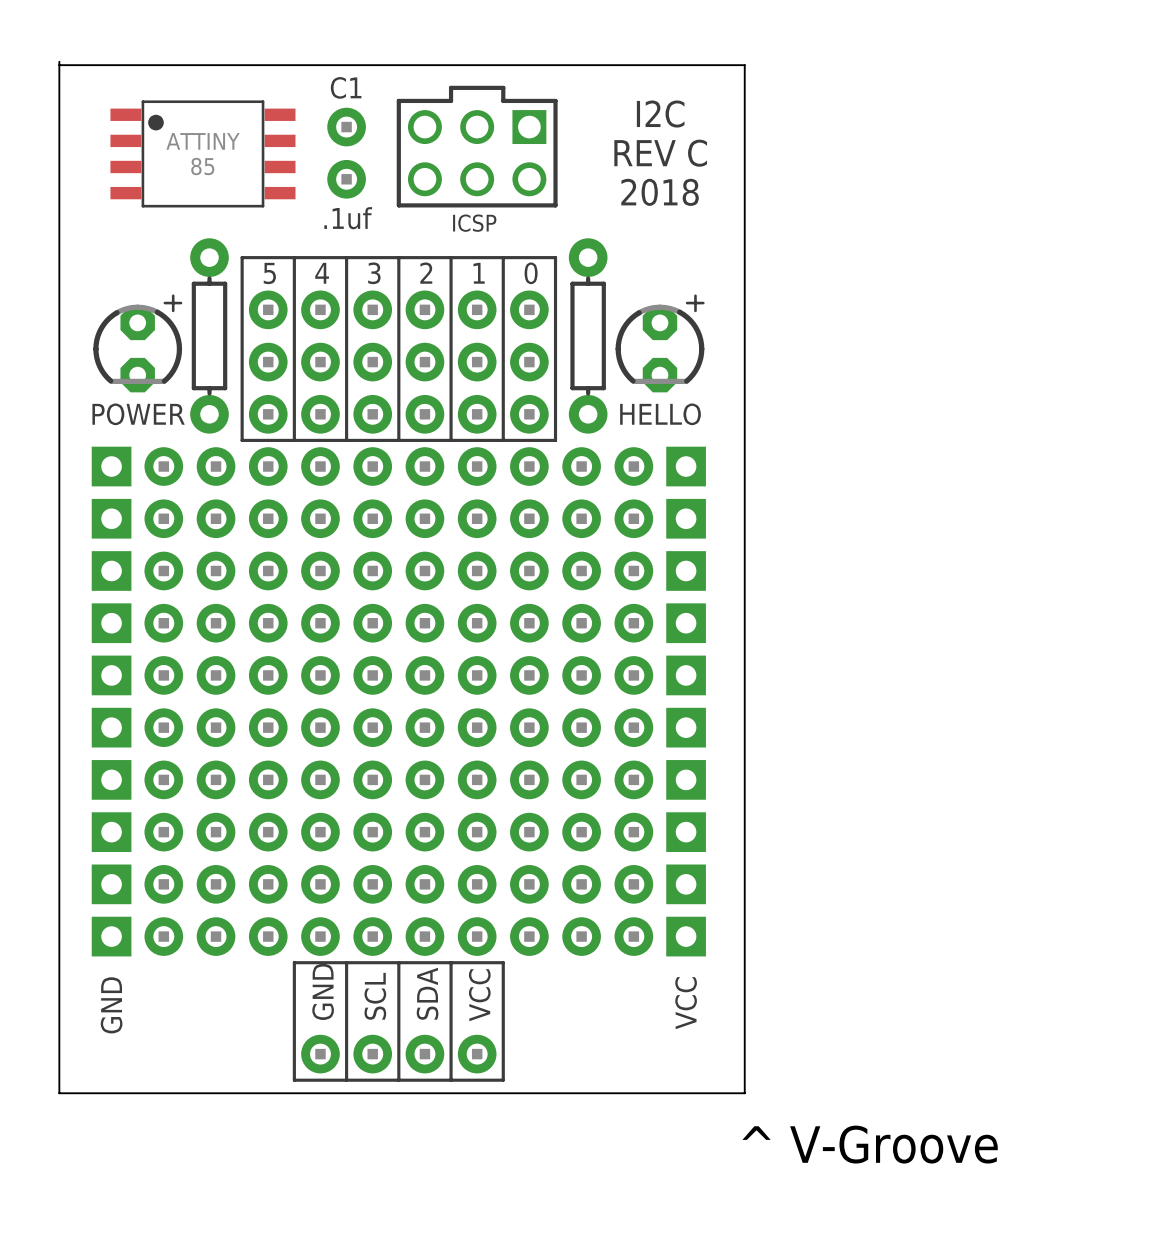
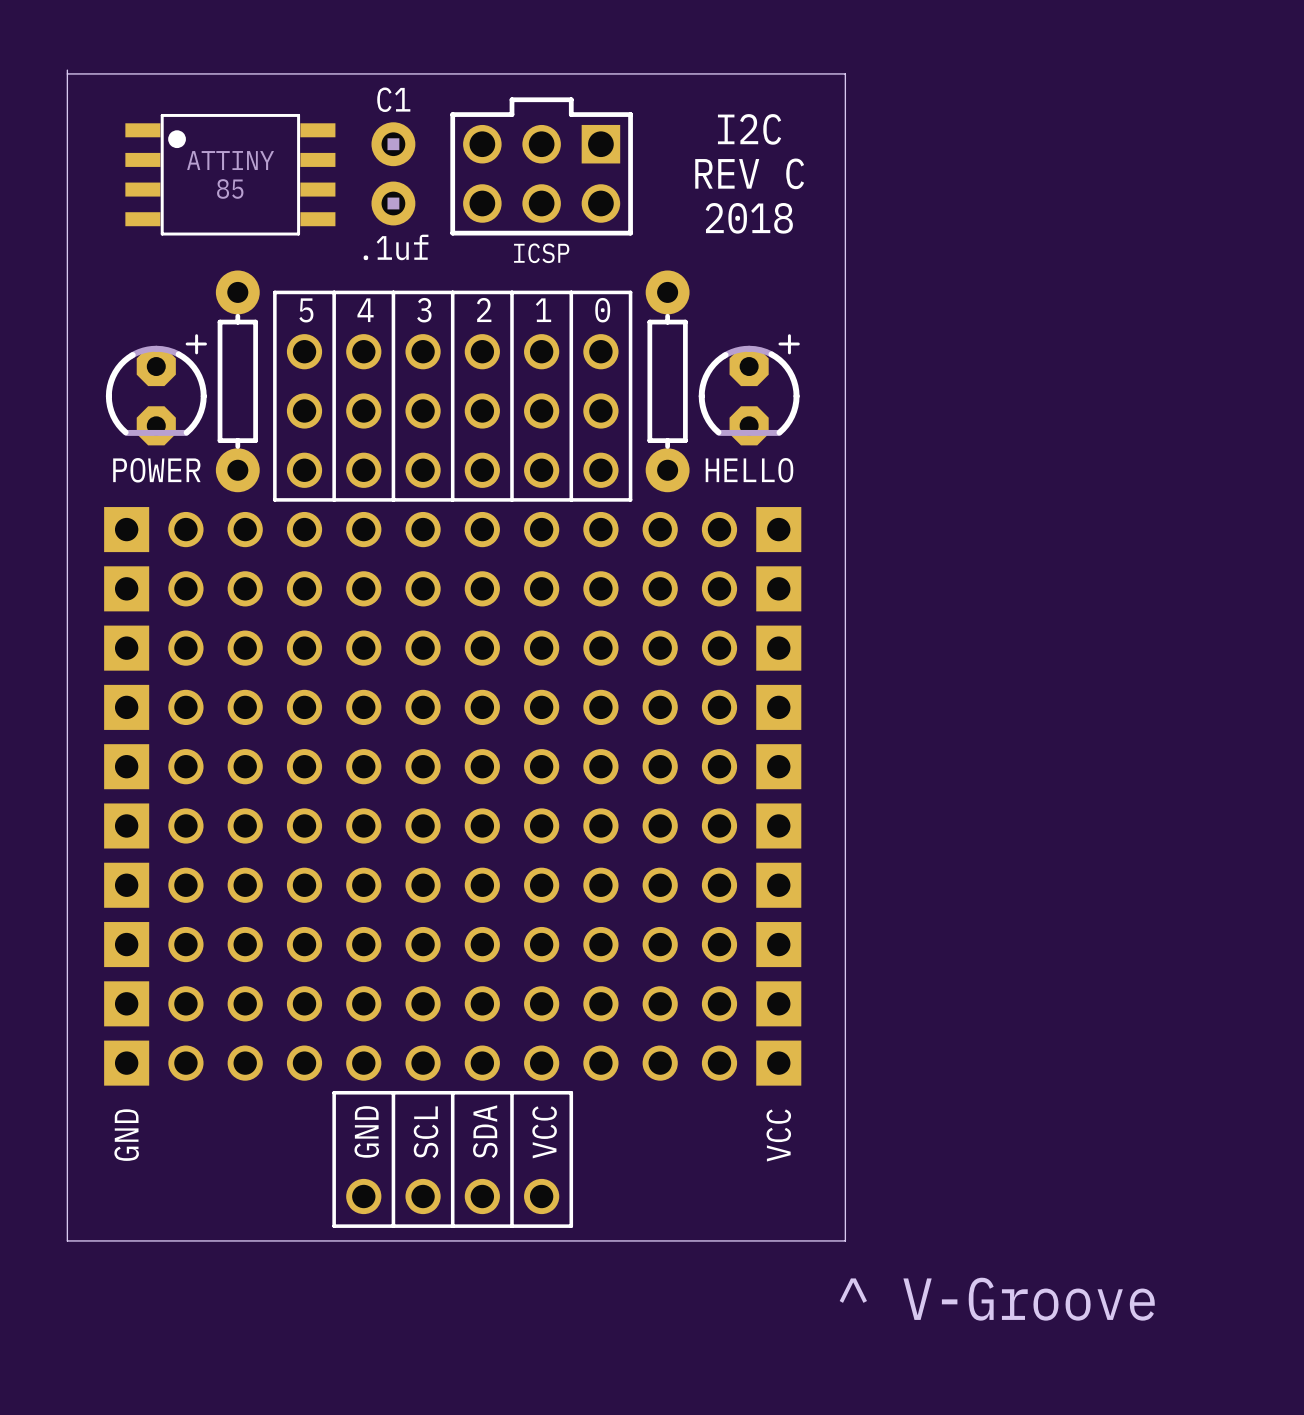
part footprint: [248, 290, 288, 330] -> [286, 334, 323, 370]
part footprint: [301, 290, 340, 330] -> [346, 334, 382, 370]
part footprint: [353, 290, 393, 330] -> [405, 334, 441, 370]
part footprint: [405, 290, 445, 330] -> [464, 334, 500, 370]
part footprint: [457, 290, 497, 330] -> [524, 334, 560, 370]
part footprint: [510, 290, 549, 330] -> [583, 334, 619, 370]
part footprint: [248, 342, 288, 382] -> [286, 393, 323, 429]
part footprint: [301, 342, 340, 382] -> [346, 393, 382, 429]
part footprint: [353, 342, 393, 382] -> [405, 393, 441, 429]
part footprint: [405, 342, 445, 382] -> [464, 393, 500, 429]
part footprint: [457, 342, 497, 382] -> [524, 393, 560, 429]
part footprint: [510, 342, 549, 382] -> [583, 393, 619, 429]
part footprint: [248, 394, 288, 434] -> [286, 452, 323, 488]
part footprint: [301, 394, 340, 434] -> [346, 452, 382, 488]
part footprint: [353, 394, 393, 434] -> [405, 452, 441, 488]
part footprint: [405, 394, 445, 434] -> [464, 452, 500, 488]
part footprint: [457, 394, 497, 434] -> [524, 452, 560, 488]
part footprint: [510, 394, 549, 434] -> [583, 452, 619, 488]
part footprint: [144, 447, 184, 486] -> [168, 511, 204, 548]
part footprint: [196, 447, 236, 486] -> [227, 511, 263, 548]
part footprint: [248, 447, 288, 486] -> [286, 511, 323, 548]
part footprint: [301, 447, 340, 486] -> [346, 511, 382, 548]
part footprint: [353, 447, 393, 486] -> [405, 511, 441, 548]
part footprint: [405, 447, 445, 486] -> [464, 511, 500, 548]
part footprint: [457, 447, 497, 486] -> [524, 511, 560, 548]
part footprint: [510, 447, 549, 486] -> [583, 511, 619, 548]
part footprint: [562, 447, 601, 486] -> [642, 511, 678, 548]
part footprint: [614, 447, 654, 486] -> [701, 511, 738, 548]
part footprint: [144, 499, 184, 539] -> [168, 571, 204, 607]
part footprint: [196, 499, 236, 539] -> [227, 571, 263, 607]
part footprint: [248, 499, 288, 539] -> [286, 571, 323, 607]
part footprint: [301, 499, 340, 539] -> [346, 571, 382, 607]
part footprint: [353, 499, 393, 539] -> [405, 571, 441, 607]
part footprint: [405, 499, 445, 539] -> [464, 571, 500, 607]
part footprint: [457, 499, 497, 539] -> [524, 571, 560, 607]
part footprint: [510, 499, 549, 539] -> [583, 571, 619, 607]
part footprint: [562, 499, 601, 539] -> [642, 571, 678, 607]
part footprint: [614, 499, 654, 539] -> [701, 571, 738, 607]
part footprint: [144, 551, 184, 591] -> [168, 630, 204, 666]
part footprint: [196, 551, 236, 591] -> [227, 630, 263, 666]
part footprint: [248, 551, 288, 591] -> [286, 630, 323, 666]
part footprint: [301, 551, 340, 591] -> [346, 630, 382, 666]
part footprint: [353, 551, 393, 591] -> [405, 630, 441, 666]
part footprint: [405, 551, 445, 591] -> [464, 630, 500, 666]
part footprint: [457, 551, 497, 591] -> [524, 630, 560, 666]
part footprint: [510, 551, 549, 591] -> [583, 630, 619, 666]
part footprint: [562, 551, 601, 591] -> [642, 630, 678, 666]
part footprint: [614, 551, 654, 591] -> [701, 630, 738, 666]
part footprint: [144, 603, 184, 643] -> [168, 689, 204, 726]
part footprint: [196, 603, 236, 643] -> [227, 689, 263, 726]
part footprint: [248, 603, 288, 643] -> [286, 689, 323, 726]
part footprint: [301, 603, 340, 643] -> [346, 689, 382, 726]
part footprint: [353, 603, 393, 643] -> [405, 689, 441, 726]
part footprint: [405, 603, 445, 643] -> [464, 689, 500, 726]
part footprint: [457, 603, 497, 643] -> [524, 689, 560, 726]
part footprint: [510, 603, 549, 643] -> [583, 689, 619, 726]
part footprint: [562, 603, 601, 643] -> [642, 689, 678, 726]
part footprint: [614, 603, 654, 643] -> [701, 689, 738, 726]
part footprint: [144, 656, 184, 695] -> [168, 749, 204, 785]
part footprint: [196, 656, 236, 695] -> [227, 749, 263, 785]
part footprint: [248, 656, 288, 695] -> [286, 749, 323, 785]
part footprint: [301, 656, 340, 695] -> [346, 749, 382, 785]
part footprint: [353, 656, 393, 695] -> [405, 749, 441, 785]
part footprint: [405, 656, 445, 695] -> [464, 749, 500, 785]
part footprint: [457, 656, 497, 695] -> [524, 749, 560, 785]
part footprint: [510, 656, 549, 695] -> [583, 749, 619, 785]
part footprint: [562, 656, 601, 695] -> [642, 749, 678, 785]
part footprint: [614, 656, 654, 695] -> [701, 749, 738, 785]
part footprint: [144, 708, 184, 747] -> [168, 808, 204, 844]
part footprint: [196, 708, 236, 747] -> [227, 808, 263, 844]
part footprint: [248, 708, 288, 747] -> [286, 808, 323, 844]
part footprint: [301, 708, 340, 747] -> [346, 808, 382, 844]
part footprint: [353, 708, 393, 747] -> [405, 808, 441, 844]
part footprint: [405, 708, 445, 747] -> [464, 808, 500, 844]
part footprint: [457, 708, 497, 747] -> [524, 808, 560, 844]
part footprint: [510, 708, 549, 747] -> [583, 808, 619, 844]
part footprint: [562, 708, 601, 747] -> [642, 808, 678, 844]
part footprint: [614, 708, 654, 747] -> [701, 808, 738, 844]
part footprint: [144, 760, 184, 800] -> [168, 867, 204, 903]
part footprint: [196, 760, 236, 800] -> [227, 867, 263, 903]
part footprint: [248, 760, 288, 800] -> [286, 867, 323, 903]
part footprint: [301, 760, 340, 800] -> [346, 867, 382, 903]
part footprint: [353, 760, 393, 800] -> [405, 867, 441, 903]
part footprint: [405, 760, 445, 800] -> [464, 867, 500, 903]
part footprint: [457, 760, 497, 800] -> [524, 867, 560, 903]
part footprint: [510, 760, 549, 800] -> [583, 867, 619, 903]
part footprint: [562, 760, 601, 800] -> [642, 867, 678, 903]
part footprint: [614, 760, 654, 800] -> [701, 867, 738, 903]
part footprint: [144, 812, 184, 852] -> [168, 926, 204, 963]
part footprint: [196, 812, 236, 852] -> [227, 926, 263, 963]
part footprint: [248, 812, 288, 852] -> [286, 926, 323, 963]
part footprint: [301, 812, 340, 852] -> [346, 926, 382, 963]
part footprint: [353, 812, 393, 852] -> [405, 926, 441, 963]
part footprint: [405, 812, 445, 852] -> [464, 926, 500, 963]
part footprint: [457, 812, 497, 852] -> [524, 926, 560, 963]
part footprint: [510, 812, 549, 852] -> [583, 926, 619, 963]
part footprint: [562, 812, 601, 852] -> [642, 926, 678, 963]
part footprint: [614, 812, 654, 852] -> [701, 926, 738, 963]
part footprint: [144, 865, 184, 904] -> [168, 986, 204, 1022]
part footprint: [196, 865, 236, 904] -> [227, 986, 263, 1022]
part footprint: [248, 865, 288, 904] -> [286, 986, 323, 1022]
part footprint: [301, 865, 340, 904] -> [346, 986, 382, 1022]
part footprint: [353, 865, 393, 904] -> [405, 986, 441, 1022]
part footprint: [405, 865, 445, 904] -> [464, 986, 500, 1022]
part footprint: [457, 865, 497, 904] -> [524, 986, 560, 1022]
part footprint: [510, 865, 549, 904] -> [583, 986, 619, 1022]
part footprint: [562, 865, 601, 904] -> [642, 986, 678, 1022]
part footprint: [614, 865, 654, 904] -> [701, 986, 738, 1022]
part footprint: [144, 917, 184, 956] -> [168, 1045, 204, 1081]
part footprint: [196, 917, 236, 956] -> [227, 1045, 263, 1081]
part footprint: [248, 917, 288, 956] -> [286, 1045, 323, 1081]
part footprint: [301, 917, 340, 956] -> [346, 1045, 382, 1081]
part footprint: [353, 917, 393, 956] -> [405, 1045, 441, 1081]
part footprint: [405, 917, 445, 956] -> [464, 1045, 500, 1081]
part footprint: [457, 917, 497, 956] -> [524, 1045, 560, 1081]
part footprint: [510, 917, 549, 956] -> [583, 1045, 619, 1081]
part footprint: [562, 917, 601, 956] -> [642, 1045, 678, 1081]
part footprint: [614, 917, 654, 956] -> [701, 1045, 738, 1081]
part footprint: [301, 1034, 340, 1074] -> [346, 1178, 382, 1215]
part footprint: [353, 1034, 393, 1074] -> [405, 1178, 441, 1215]
part footprint: [405, 1034, 445, 1074] -> [464, 1178, 500, 1215]
part footprint: [457, 1034, 497, 1074] -> [524, 1178, 560, 1215]

